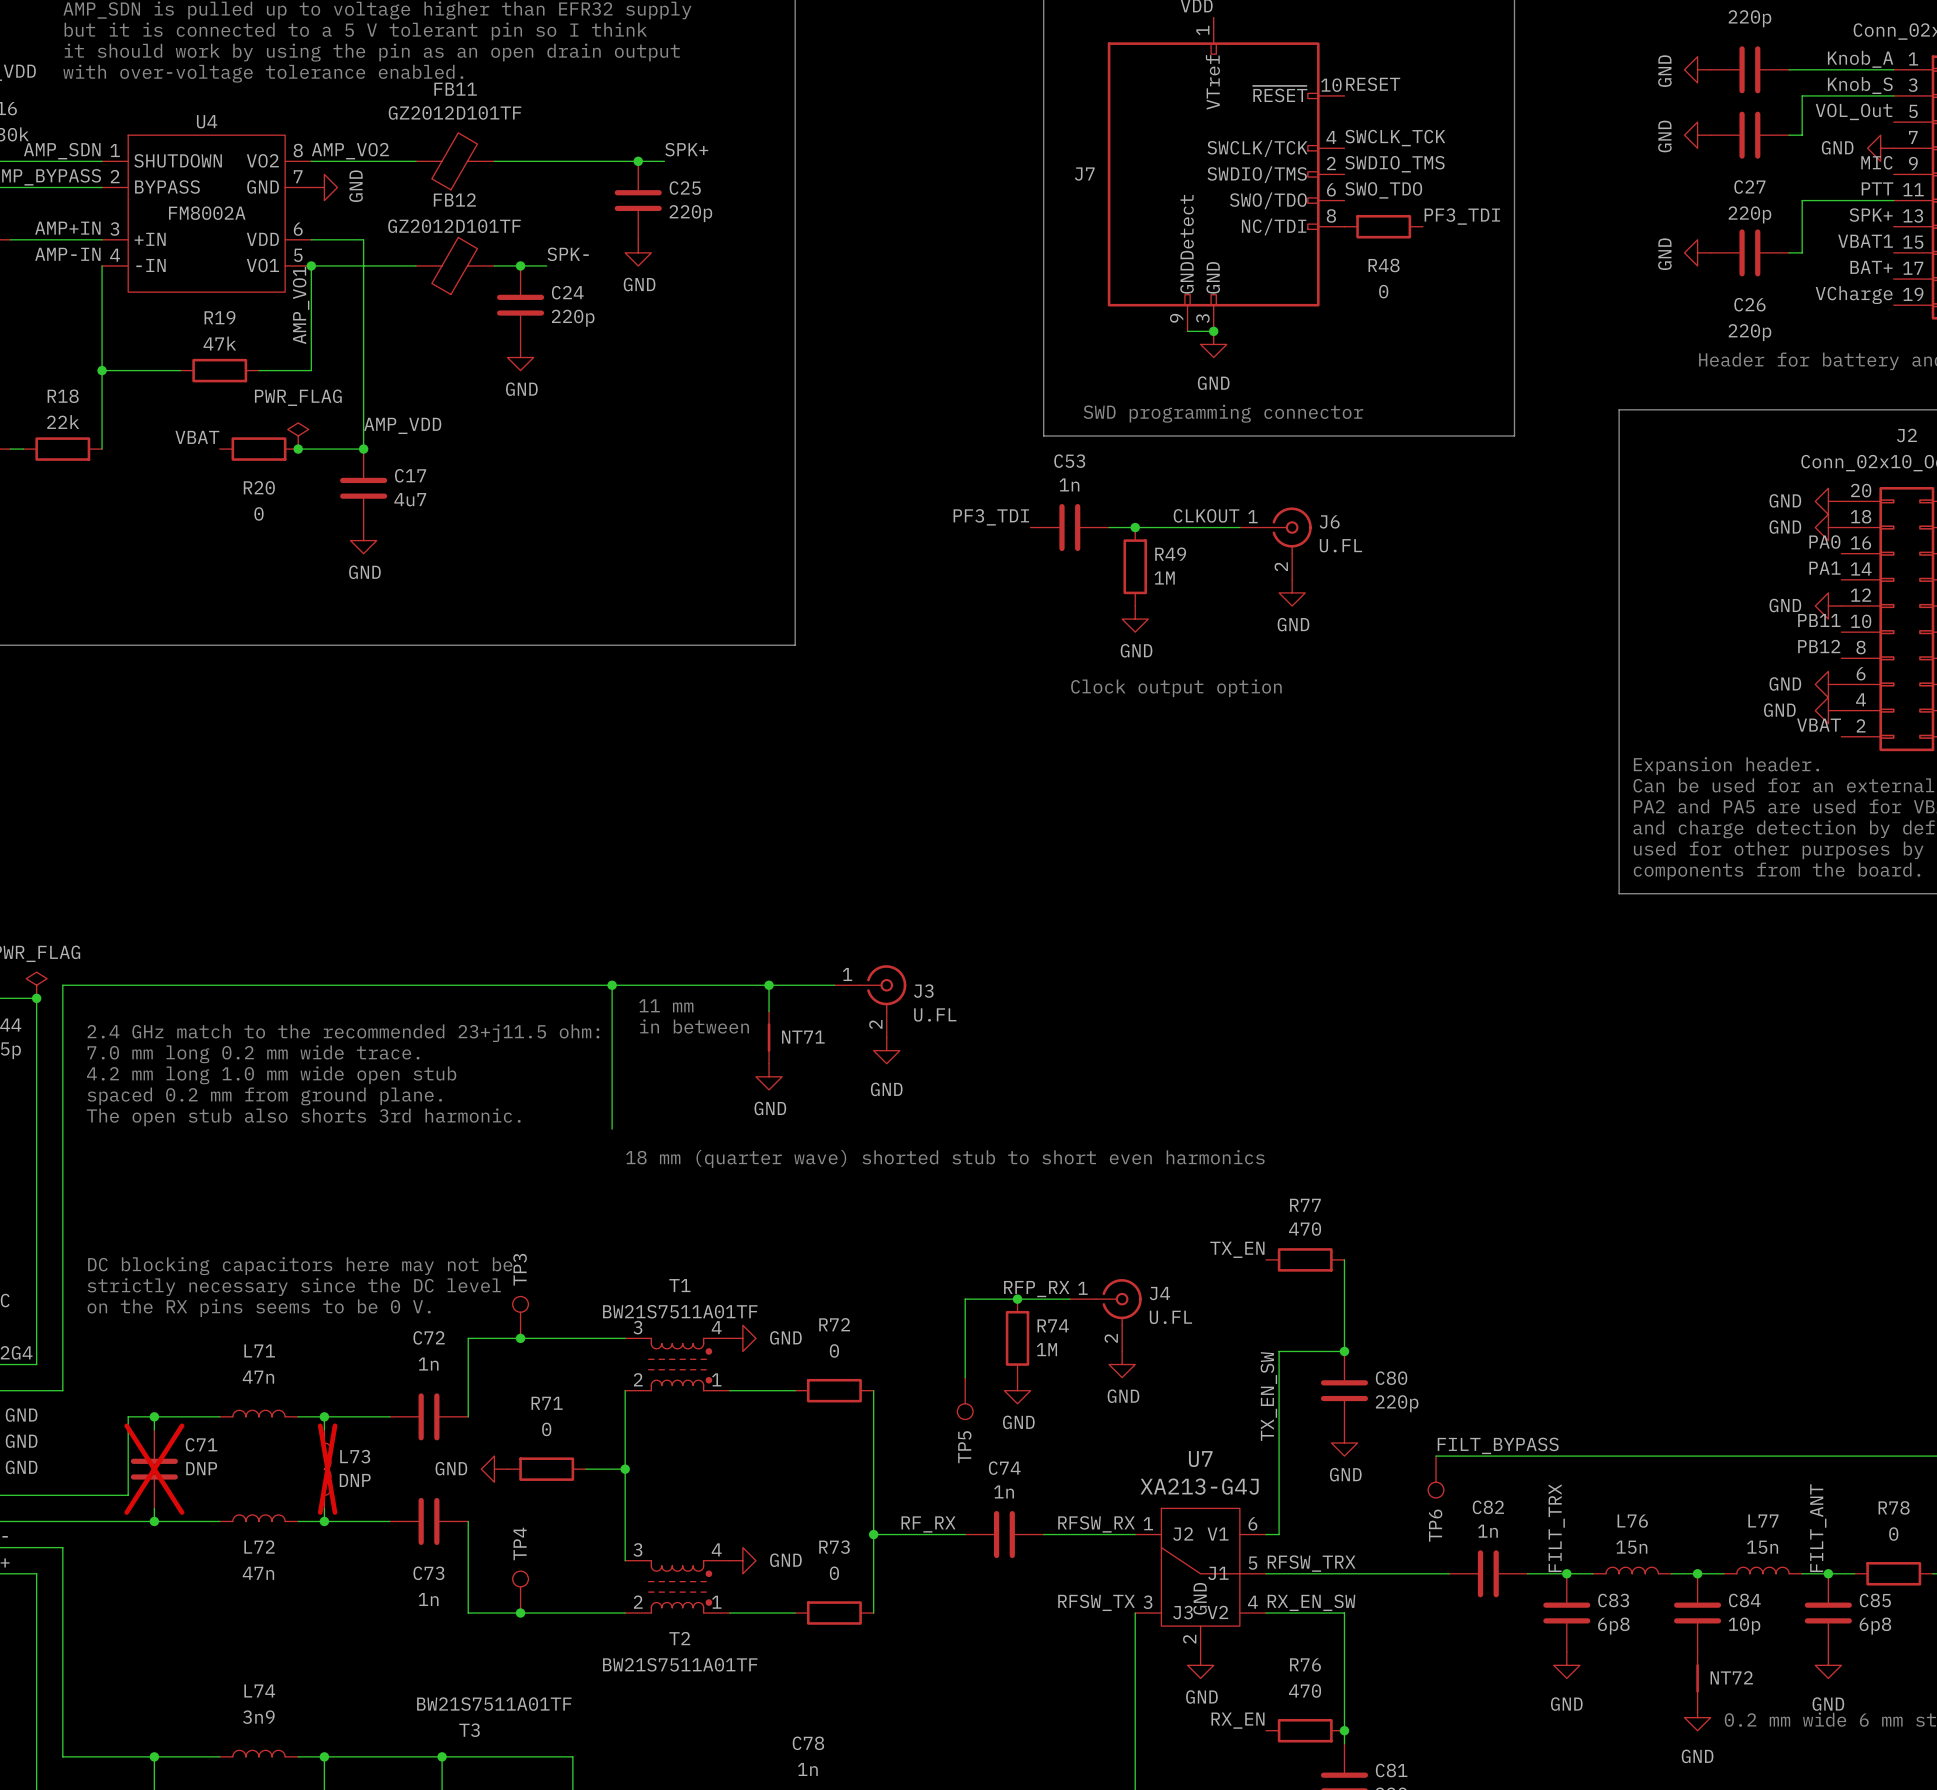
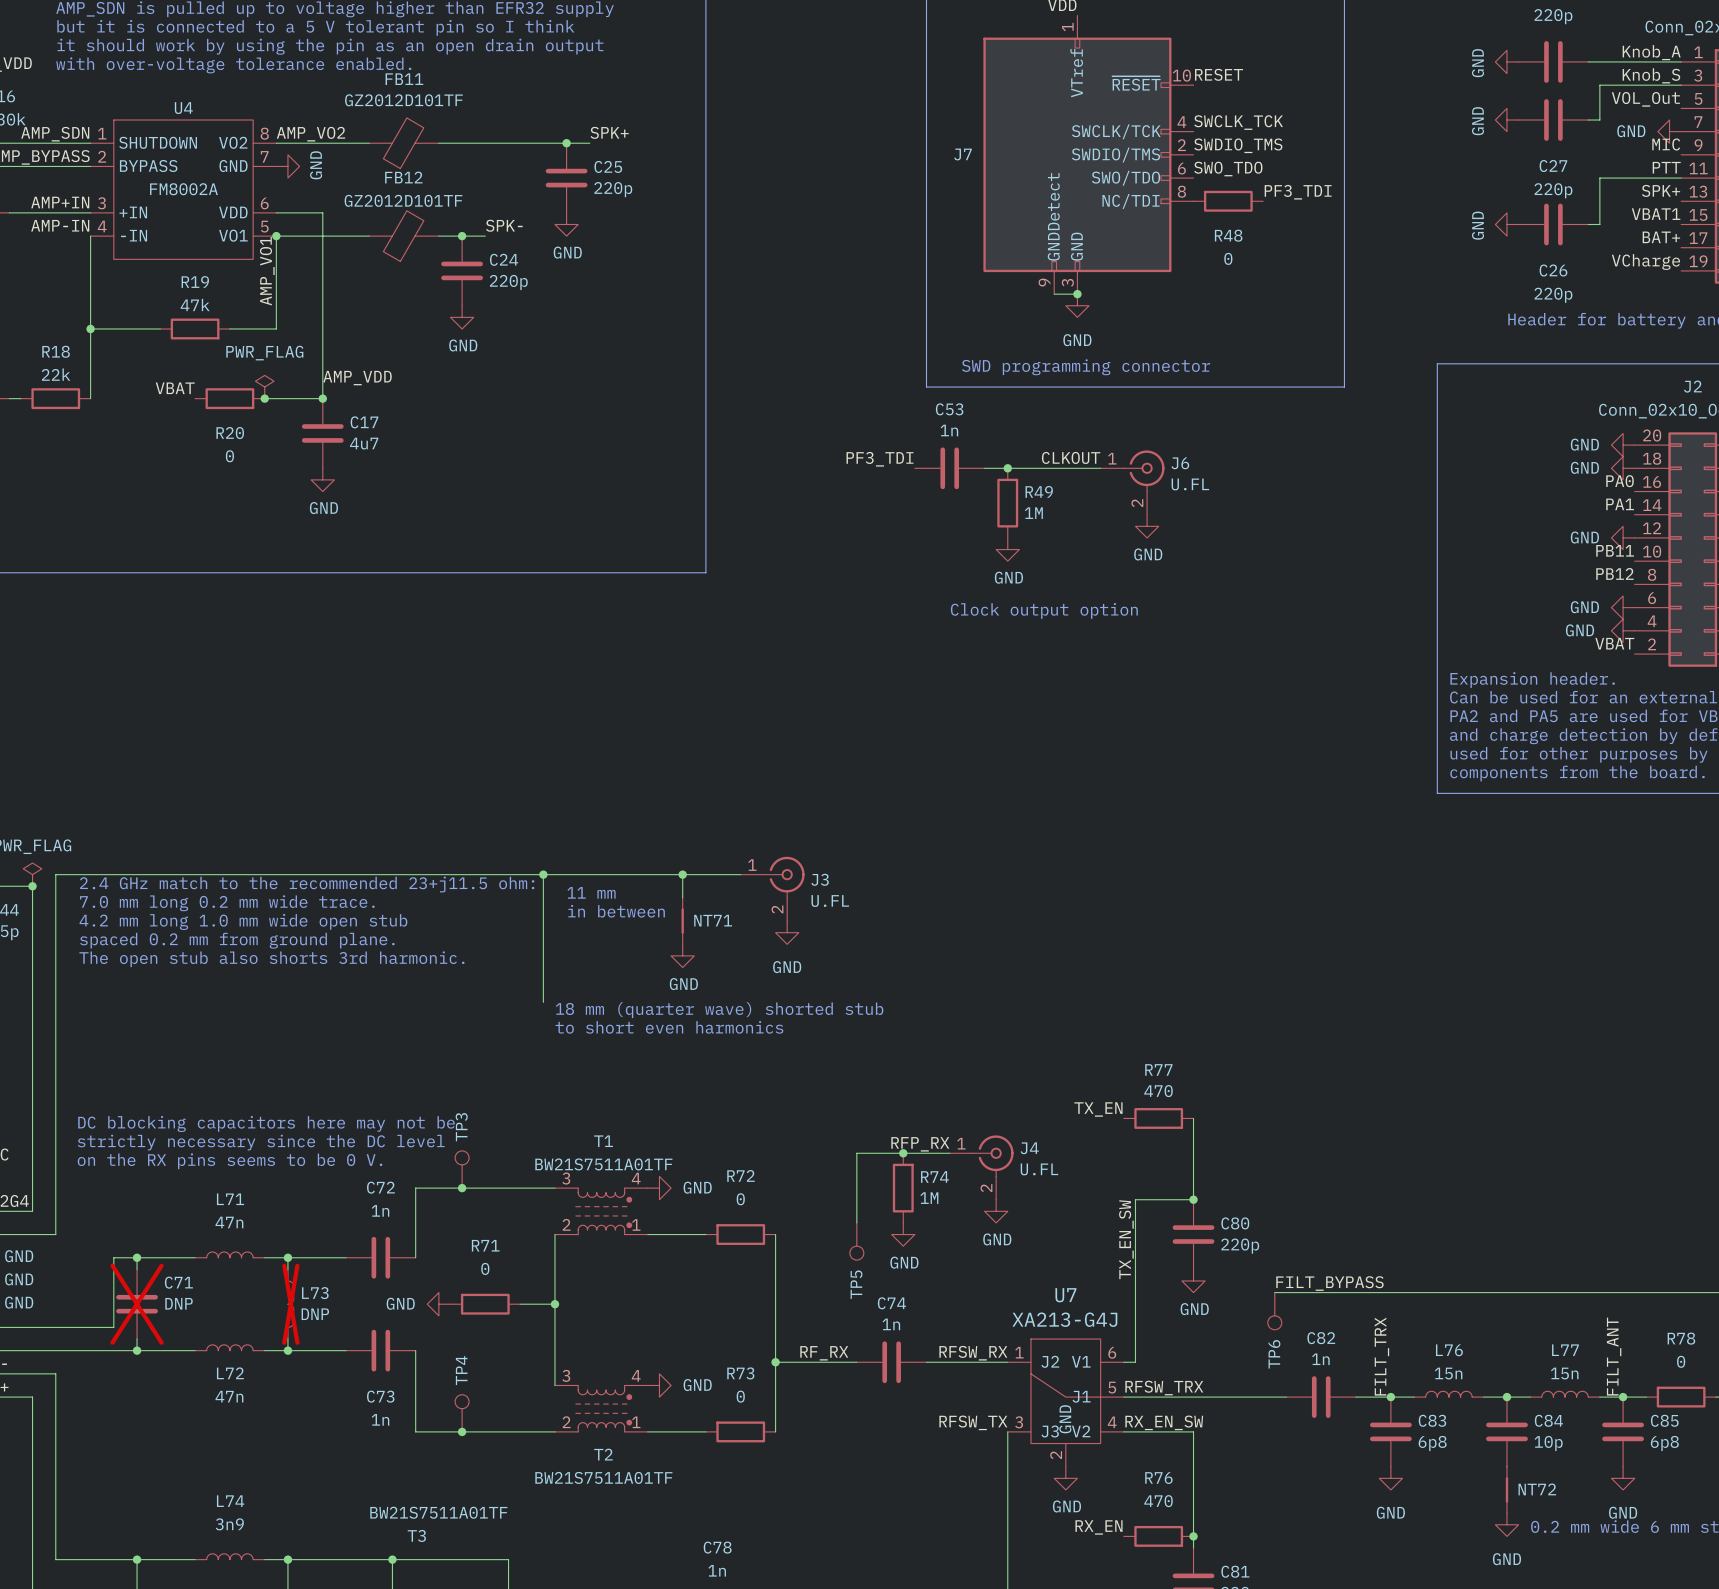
text: none -> 2.4 GHz match to the recommended 23+j11.5 ohm: (307, 884)
text: 2.4 GHz match to the recommended 23+j11.5 ohm: (343, 1033) -> 7.0 mm long 0.2 mm wide trace. (227, 903)
text: 7.0 mm long 0.2 mm wide trace. (253, 1054) -> 4.2 mm long 1.0 mm wide open stub (243, 921)
text: 4.2 mm long 1.0 mm wide open stub (271, 1075) -> spaced 0.2 mm from ground plane. (237, 940)
text: spaced 0.2 mm from ground plane. (264, 1096) -> The open stub also shorts 3rd harmonic. (271, 959)
text: The open stub also shorts 3rd harmonic. (303, 1117) -> none
text: none -> 18 mm (quarter wave) shorted stub (719, 1010)
text: 18 mm (quarter wave) shorted stub to short even harmonics (945, 1158) -> to short even harmonics (669, 1027)

